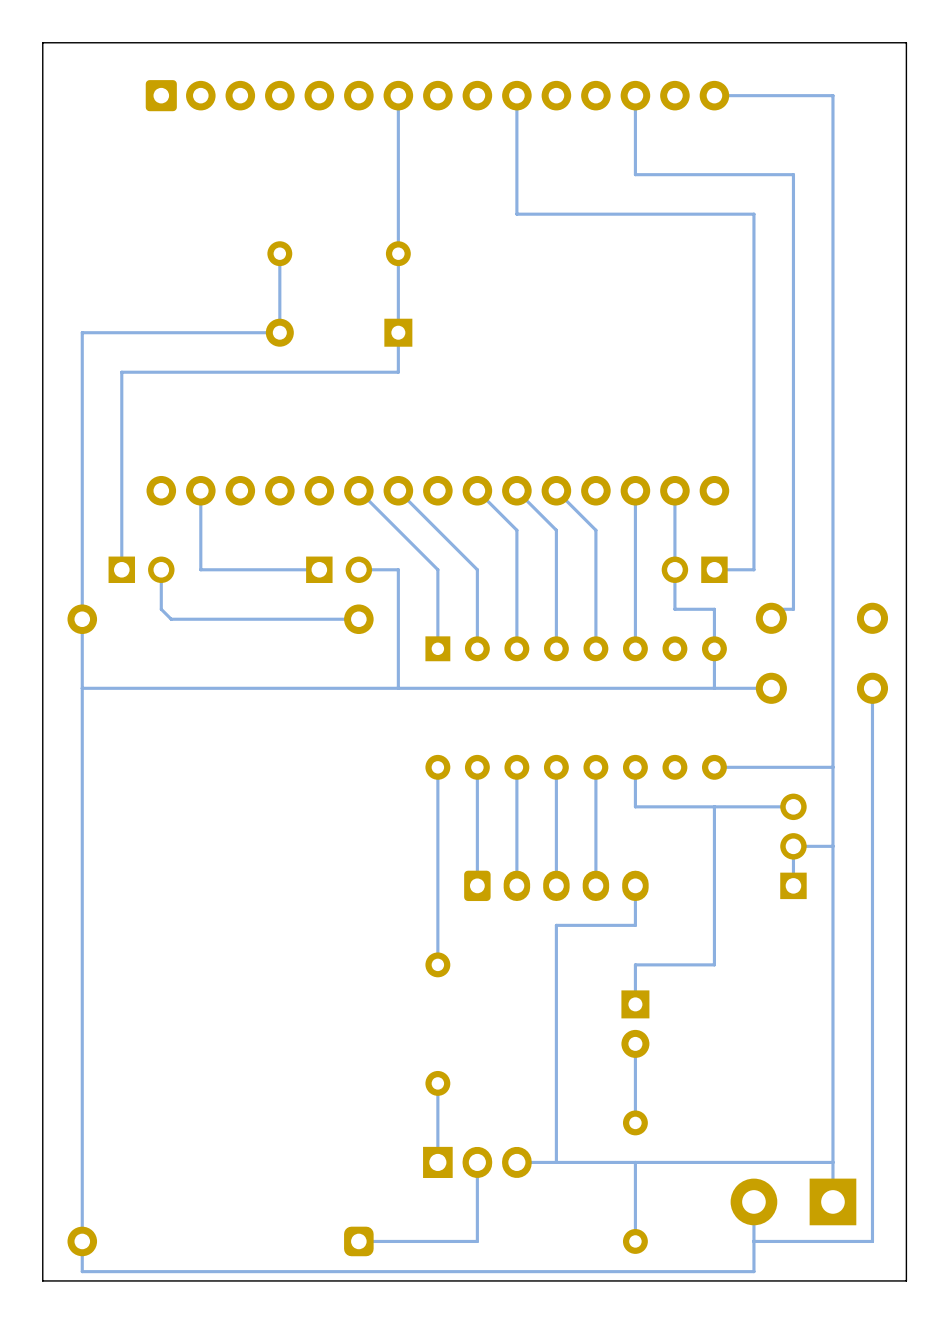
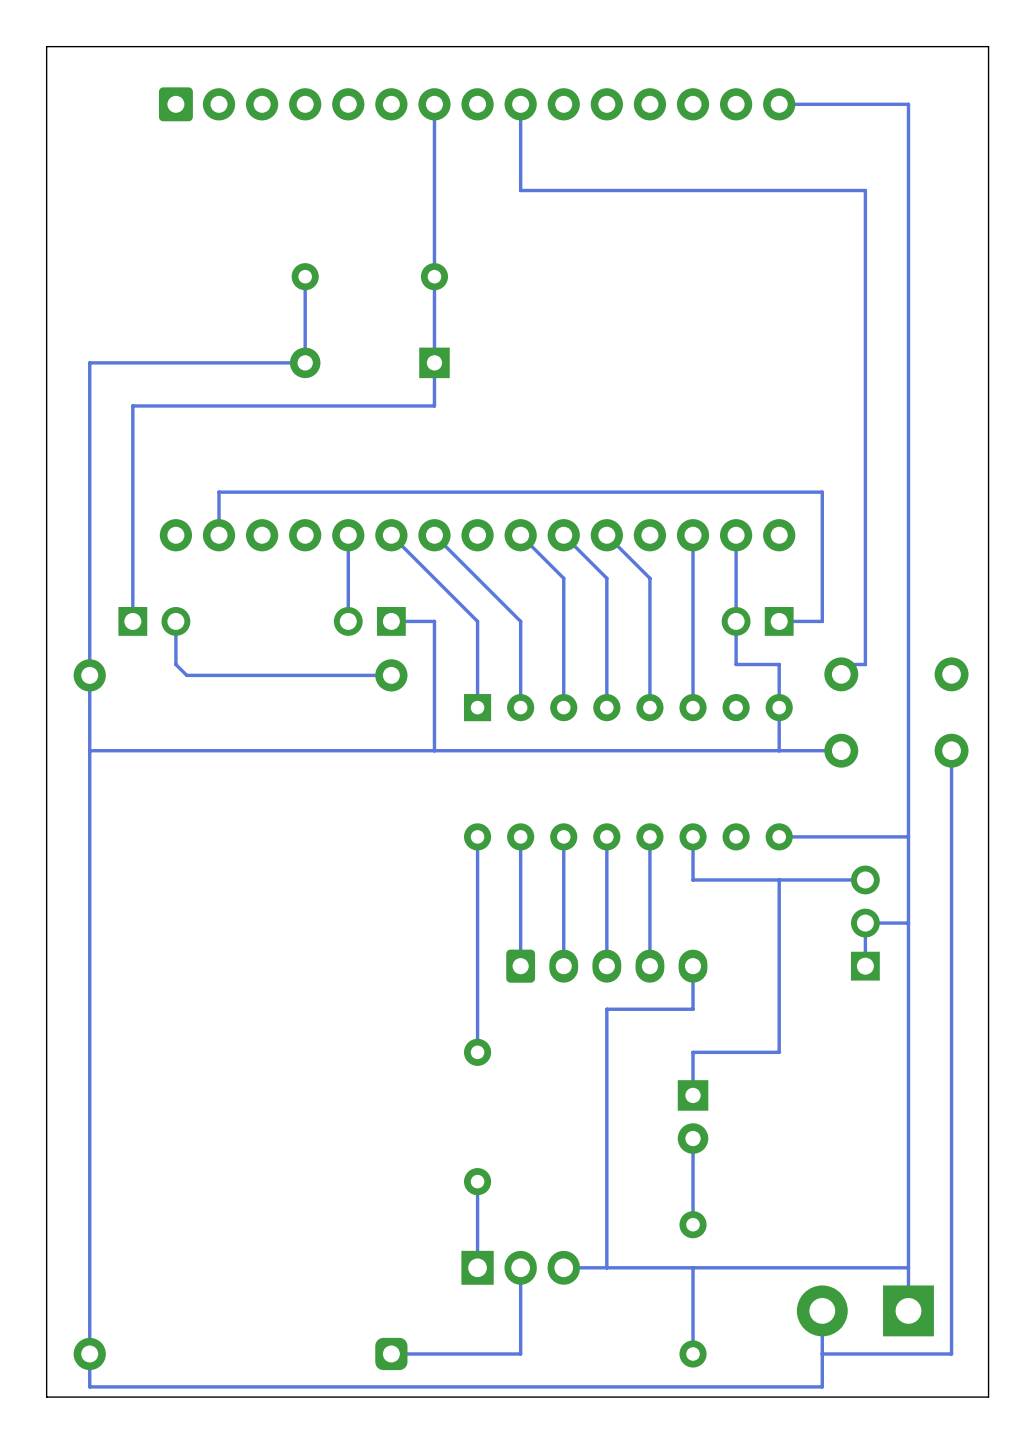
track: (516, 95) (516, 214) (753, 214) (753, 451) -> (219, 535) (219, 492) (822, 492)
track: (635, 95) (635, 174) -> (520, 104) (520, 190) (693, 190)
track: (200, 490) (200, 569) (319, 569) -> (348, 535) (348, 621)
part rotation: 0° (339, 569) -> 180° (369, 621)

